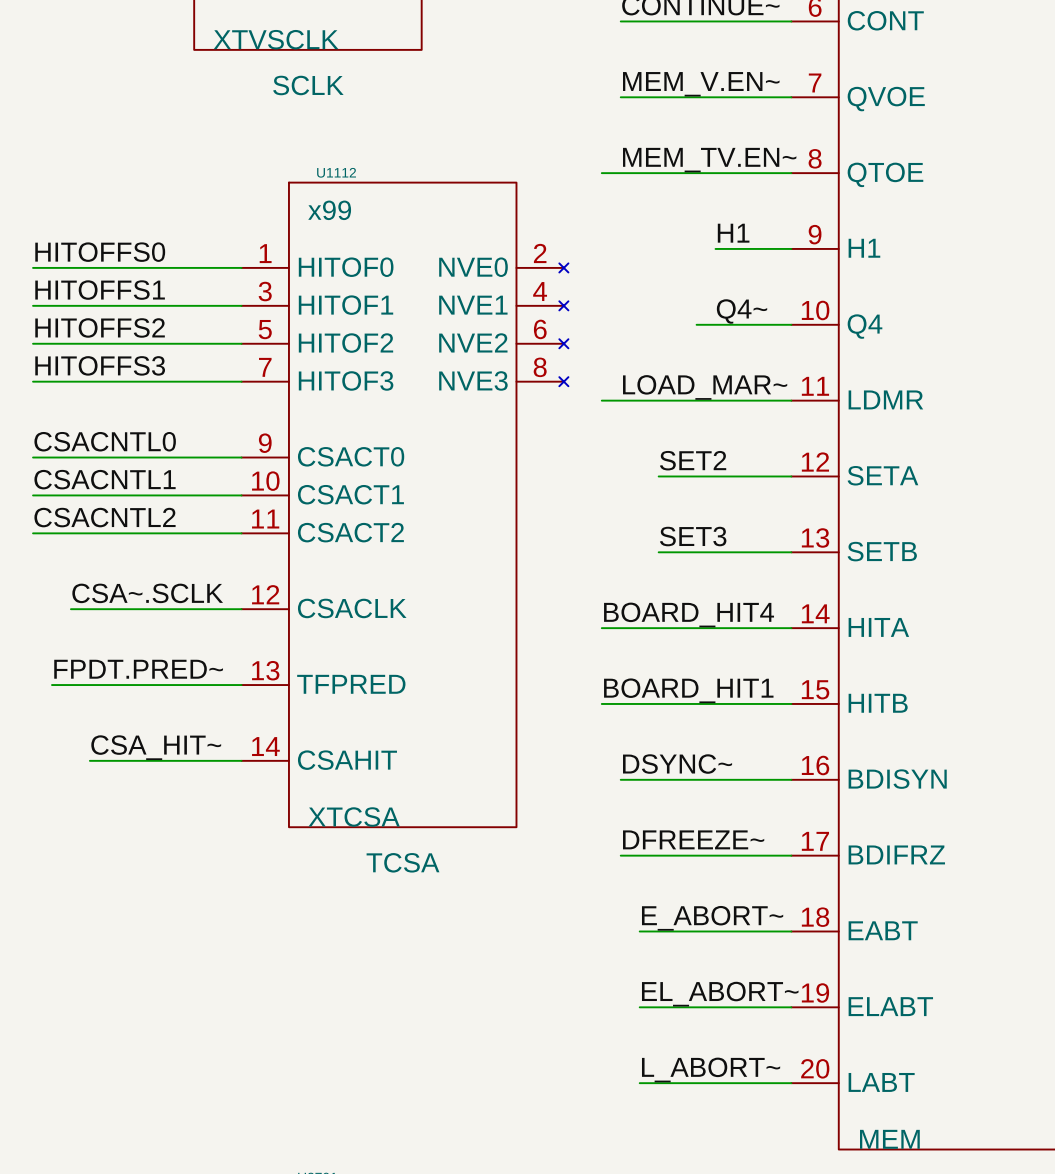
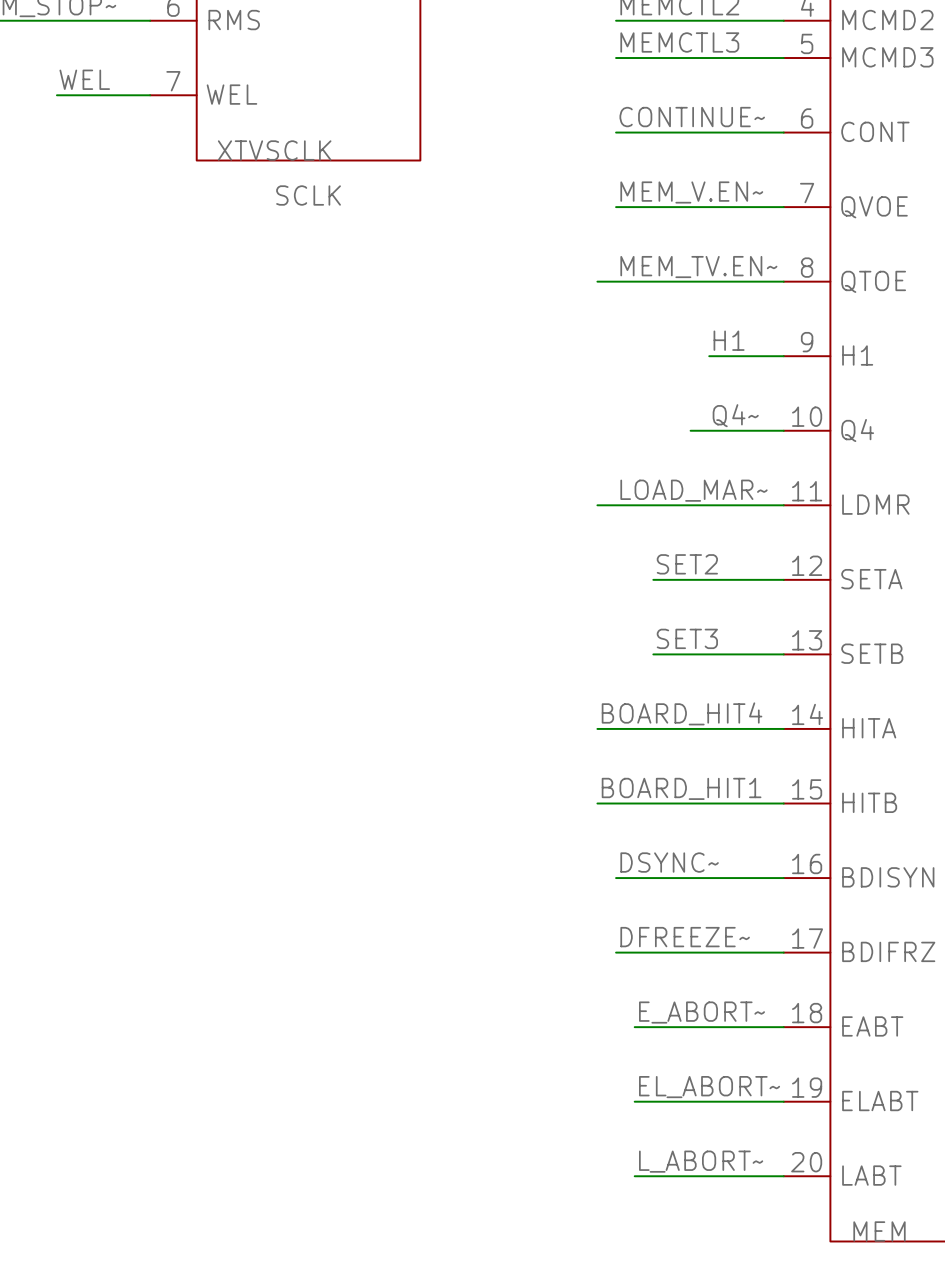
label: HITOFFS0 (100, 252) -> none
wire: (33, 267) (241, 267) -> none
no-connect mark: (563, 267) -> none
label: HITOFFS1 (100, 290) -> none
wire: (33, 305) (241, 305) -> none
no-connect mark: (563, 305) -> none
label: HITOFFS2 (100, 327) -> none
wire: (33, 343) (241, 343) -> none
no-connect mark: (563, 343) -> none
label: HITOFFS3 (100, 365) -> none
wire: (33, 381) (241, 381) -> none
no-connect mark: (563, 381) -> none
label: CSACNTL0 (105, 441) -> none
wire: (33, 457) (241, 457) -> none
label: CSACNTL1 (105, 479) -> none
wire: (33, 495) (241, 495) -> none
U1112: XTCSA (402, 504) -> none
label: CSACNTL2 (105, 517) -> none
wire: (33, 533) (241, 533) -> none
label: CSA~.SCLK (147, 593) -> none
wire: (70, 609) (241, 609) -> none
label: FPDT.PRED~ (138, 669) -> none
wire: (51, 685) (241, 685) -> none
label: CSA_HIT~ (156, 747) -> none
wire: (89, 760) (241, 760) -> none

